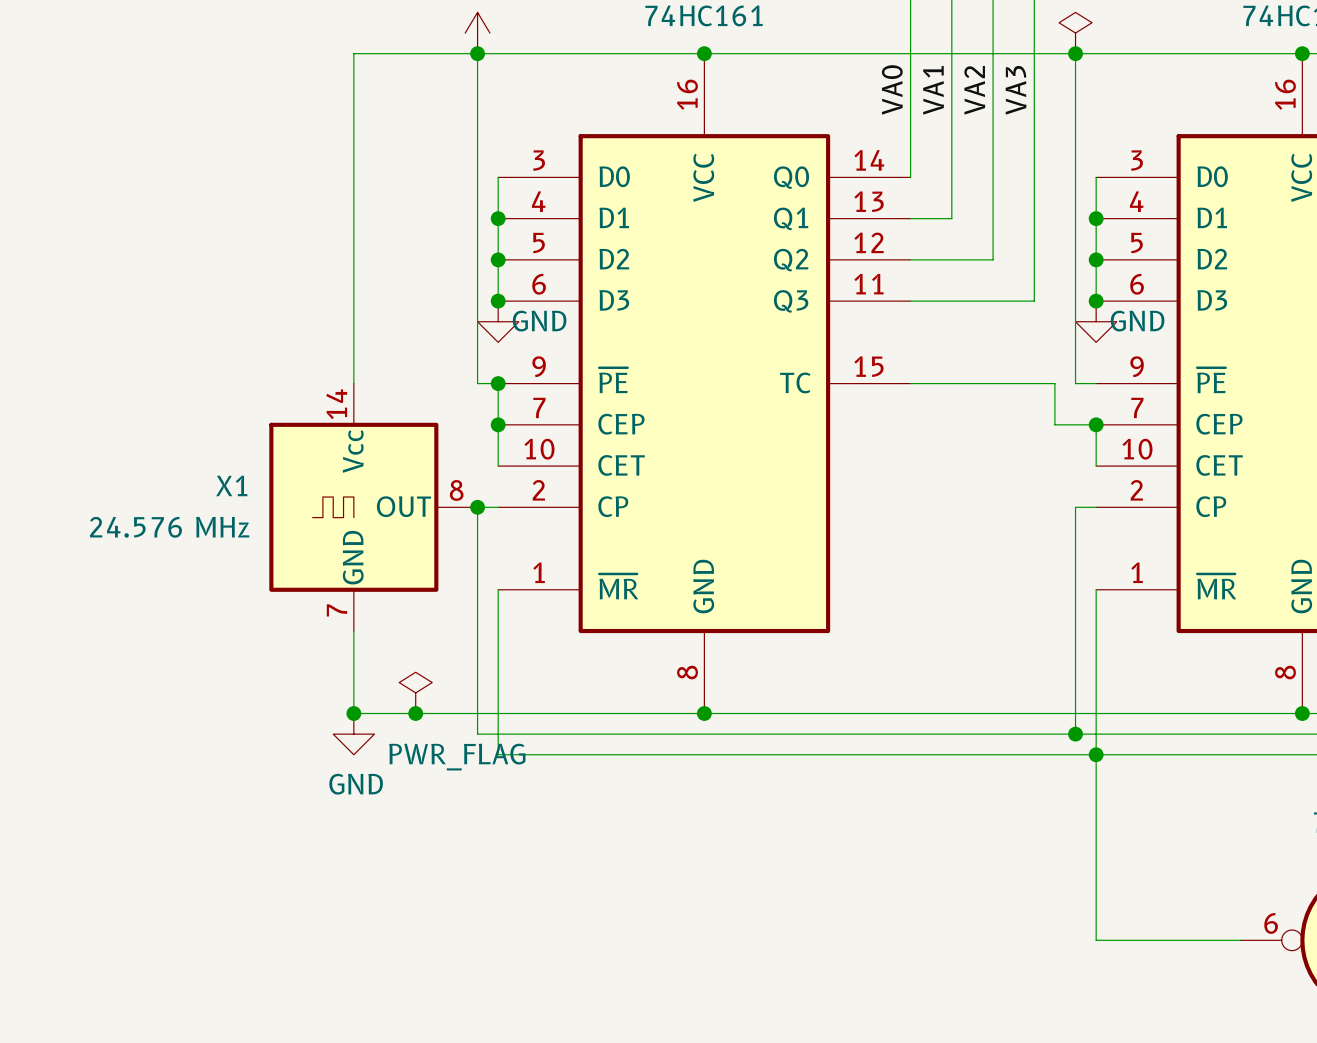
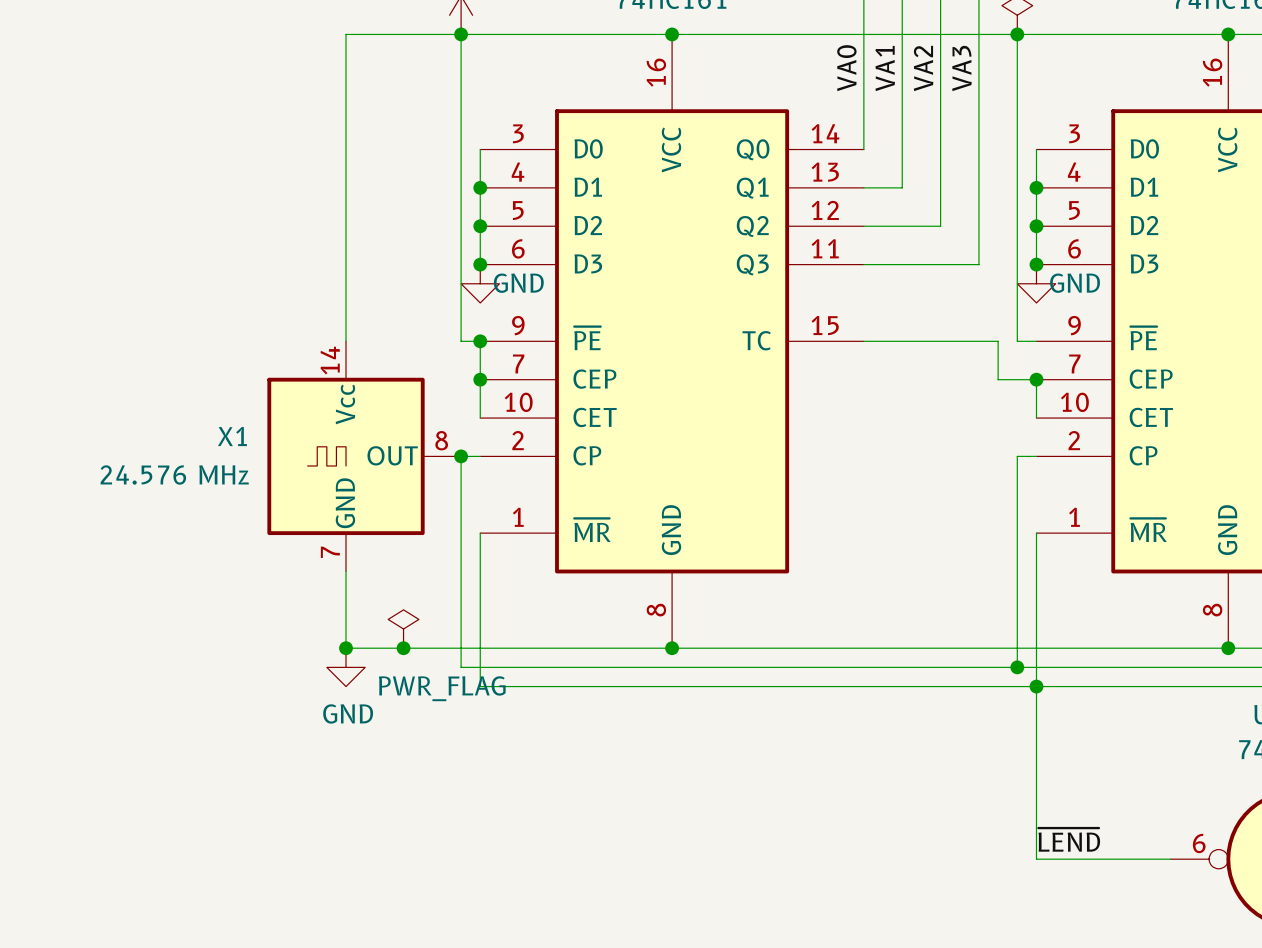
label: none -> ~{LEND} (1069, 839)

